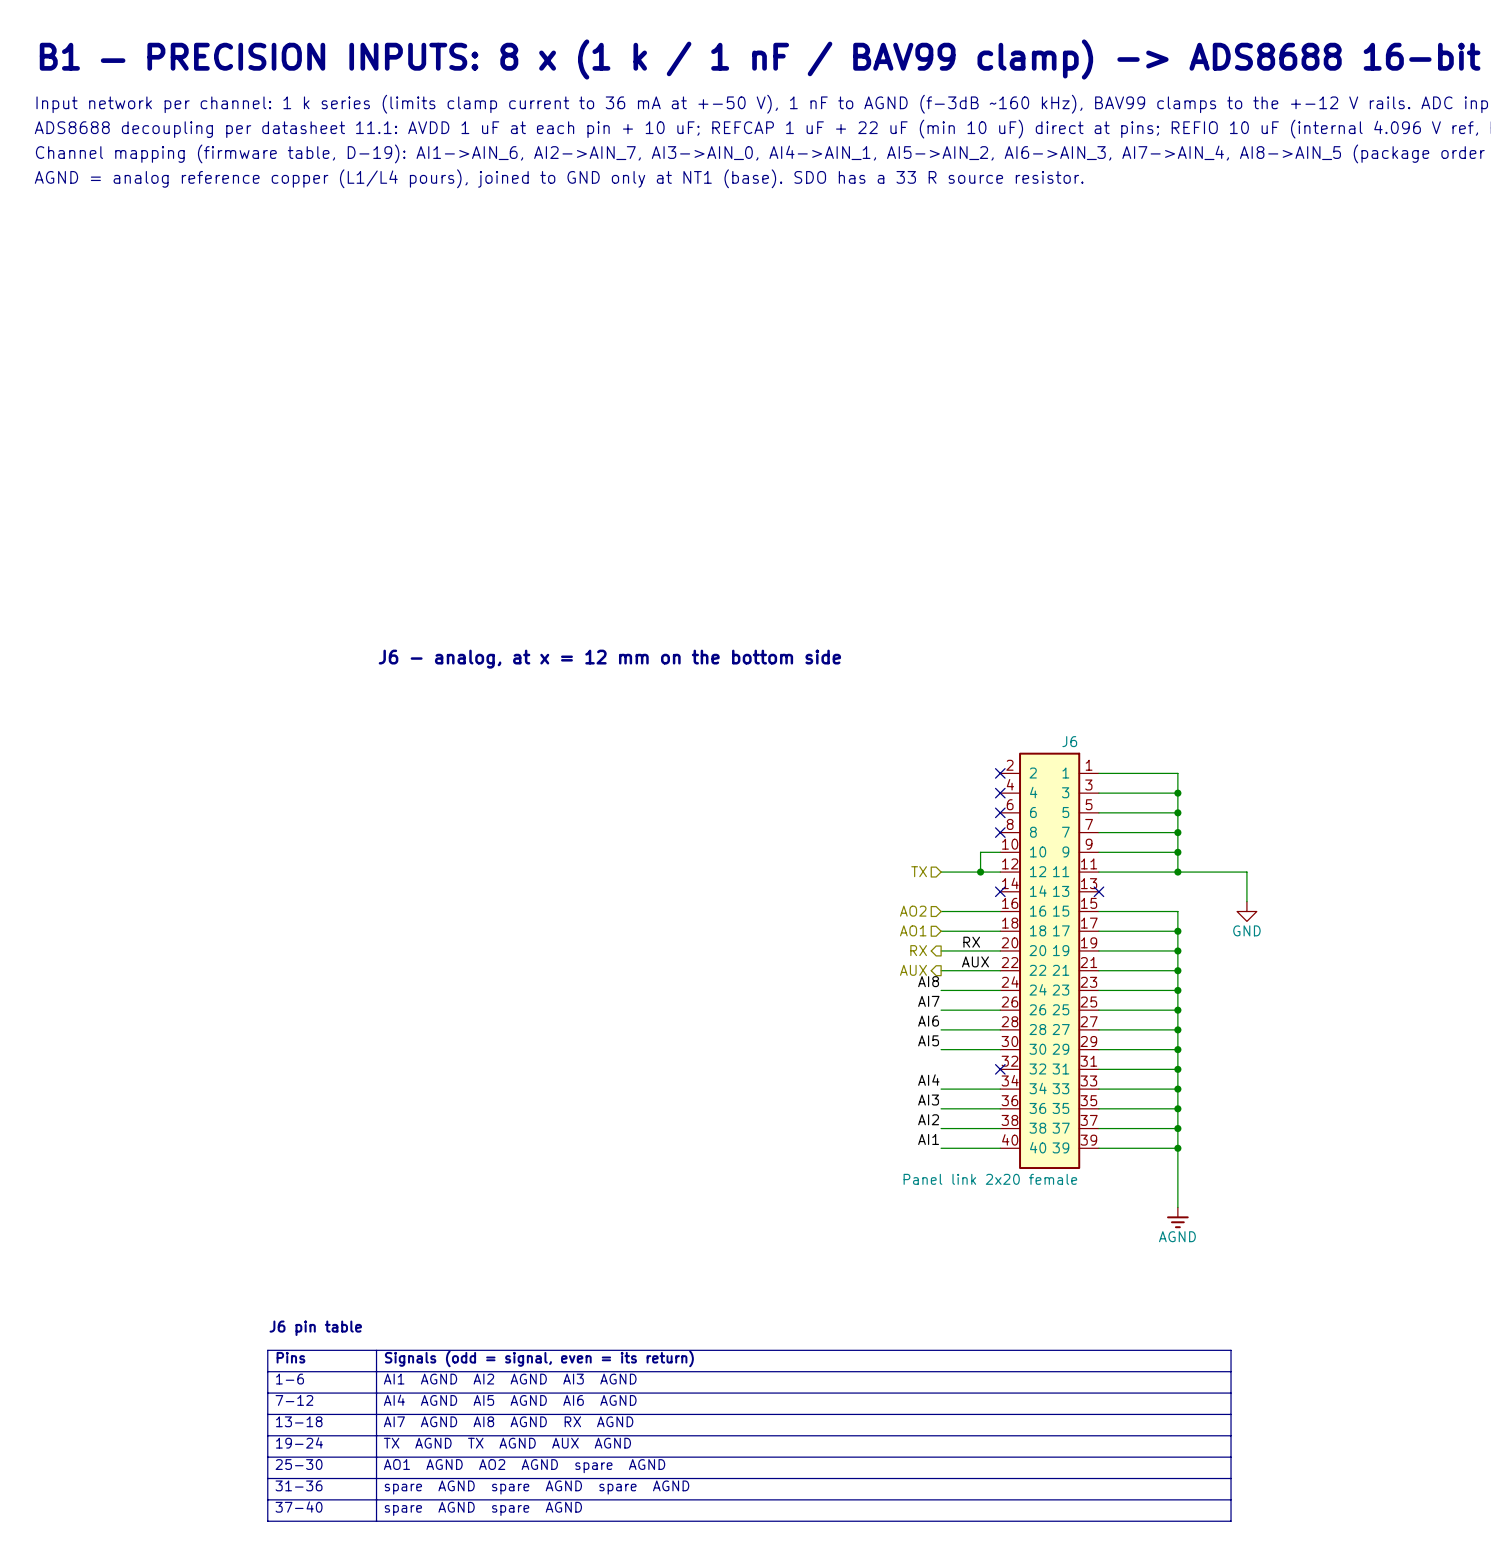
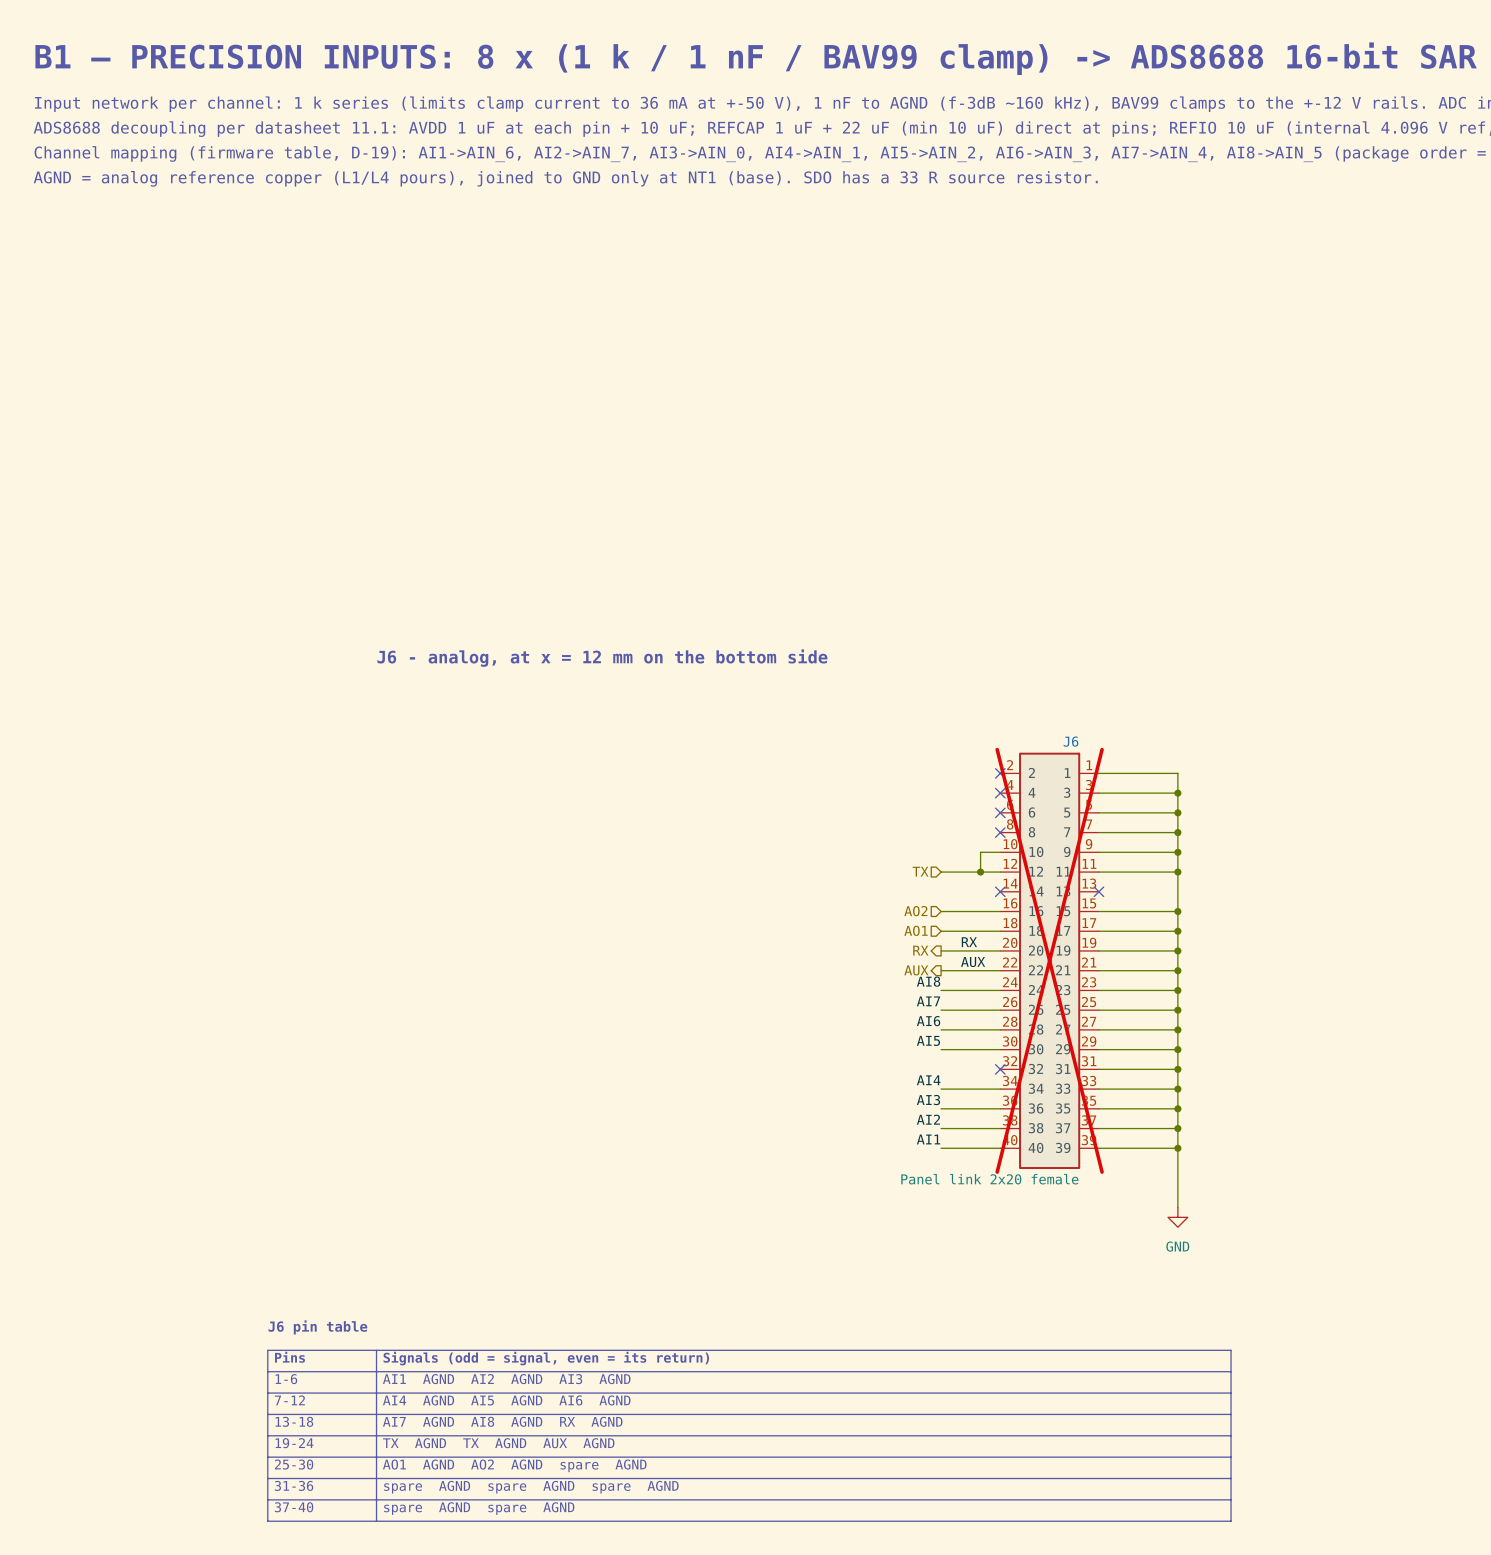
wire: (1177, 872) (1246, 872) (1246, 901) -> (1177, 872) (1177, 911)
junction: none -> (1177, 911)
power symbol: GND (1246, 911) -> none
J6 do-not-place cross: none -> (1049, 960)
power symbol: AGND (1177, 1217) -> GND (1177, 1217)

